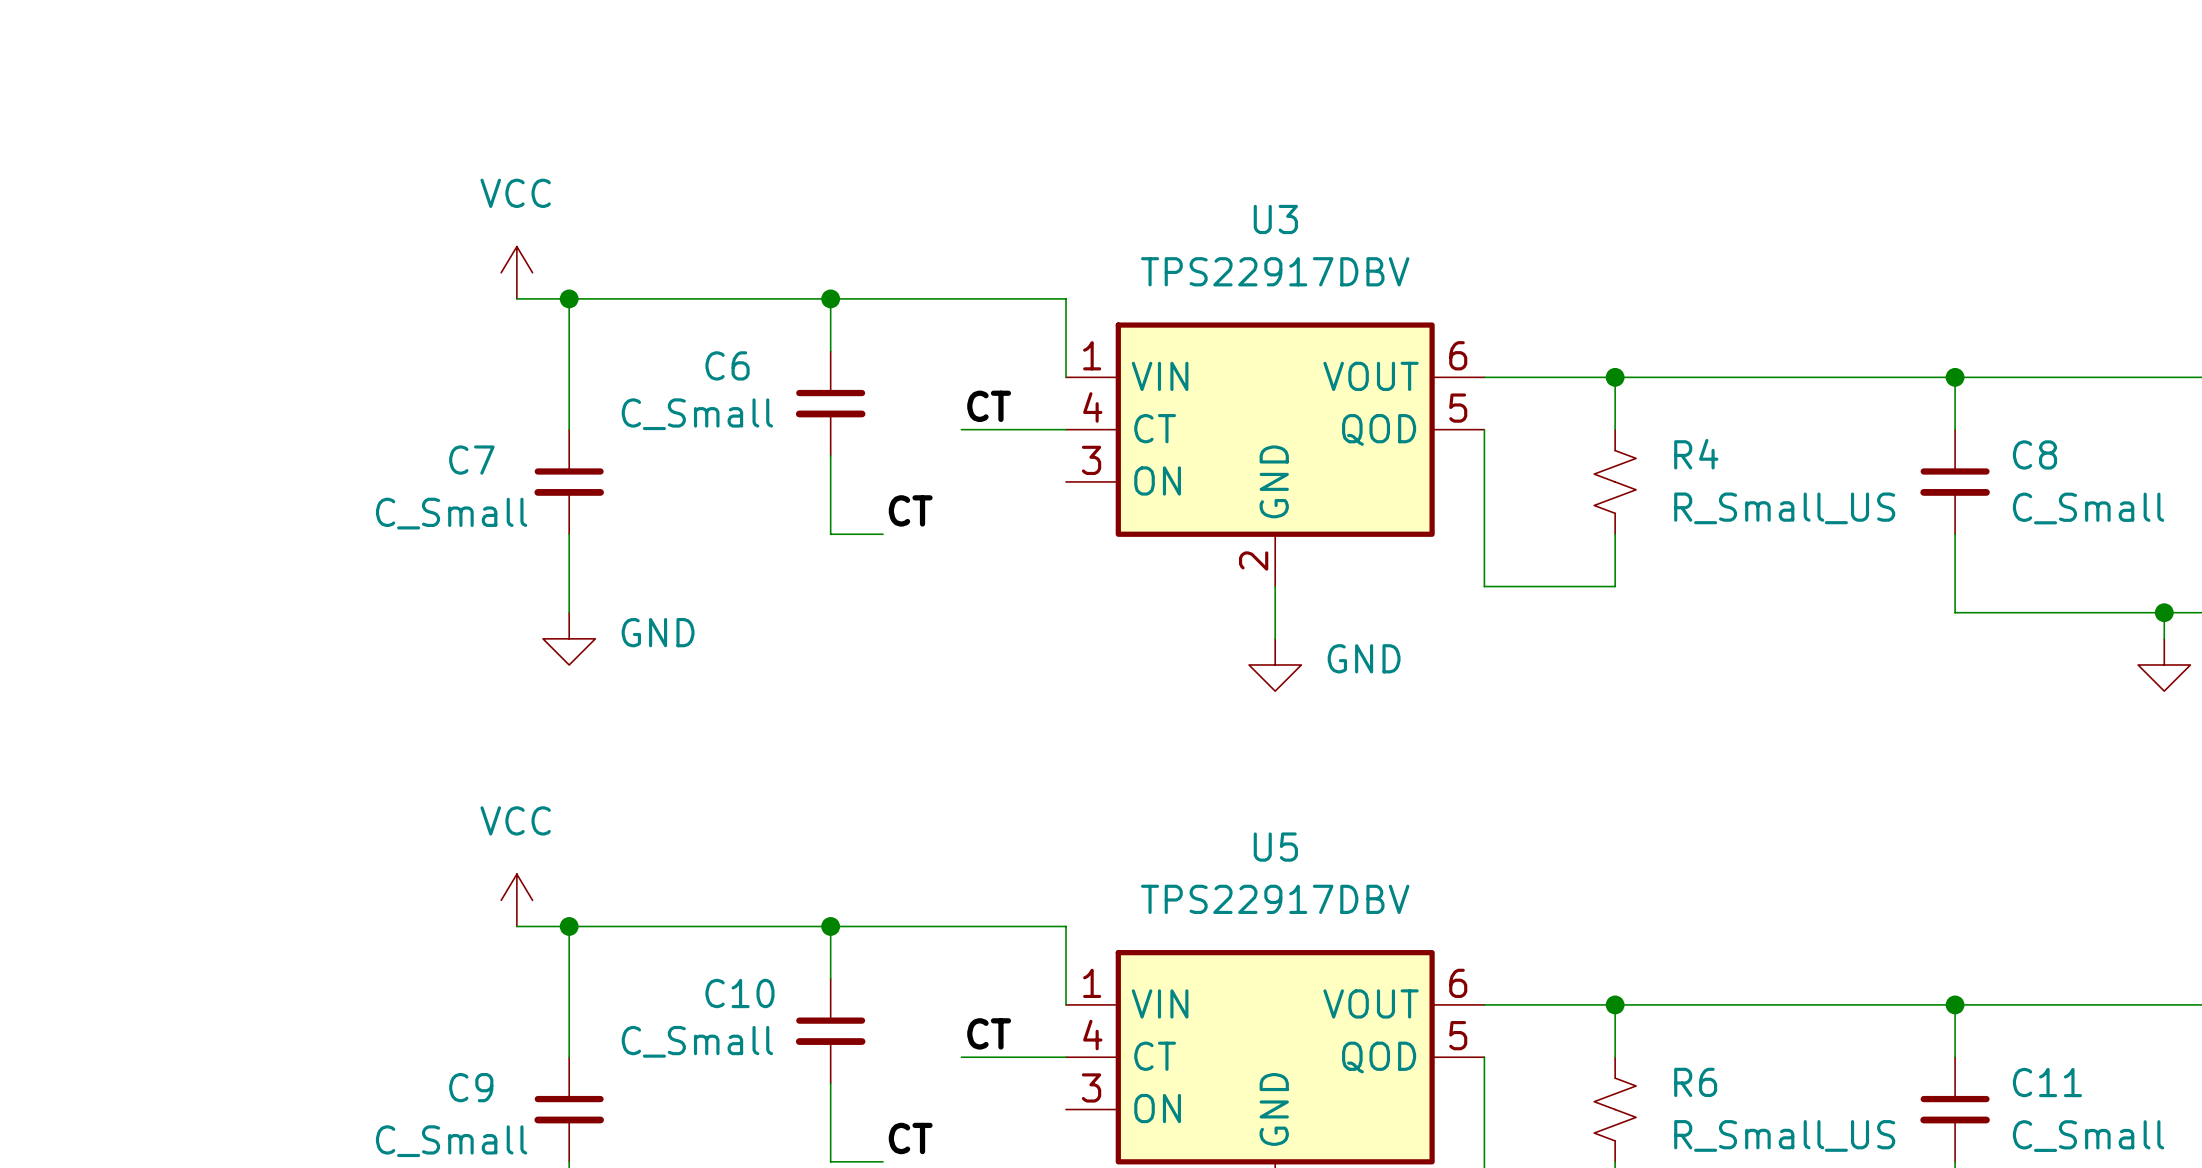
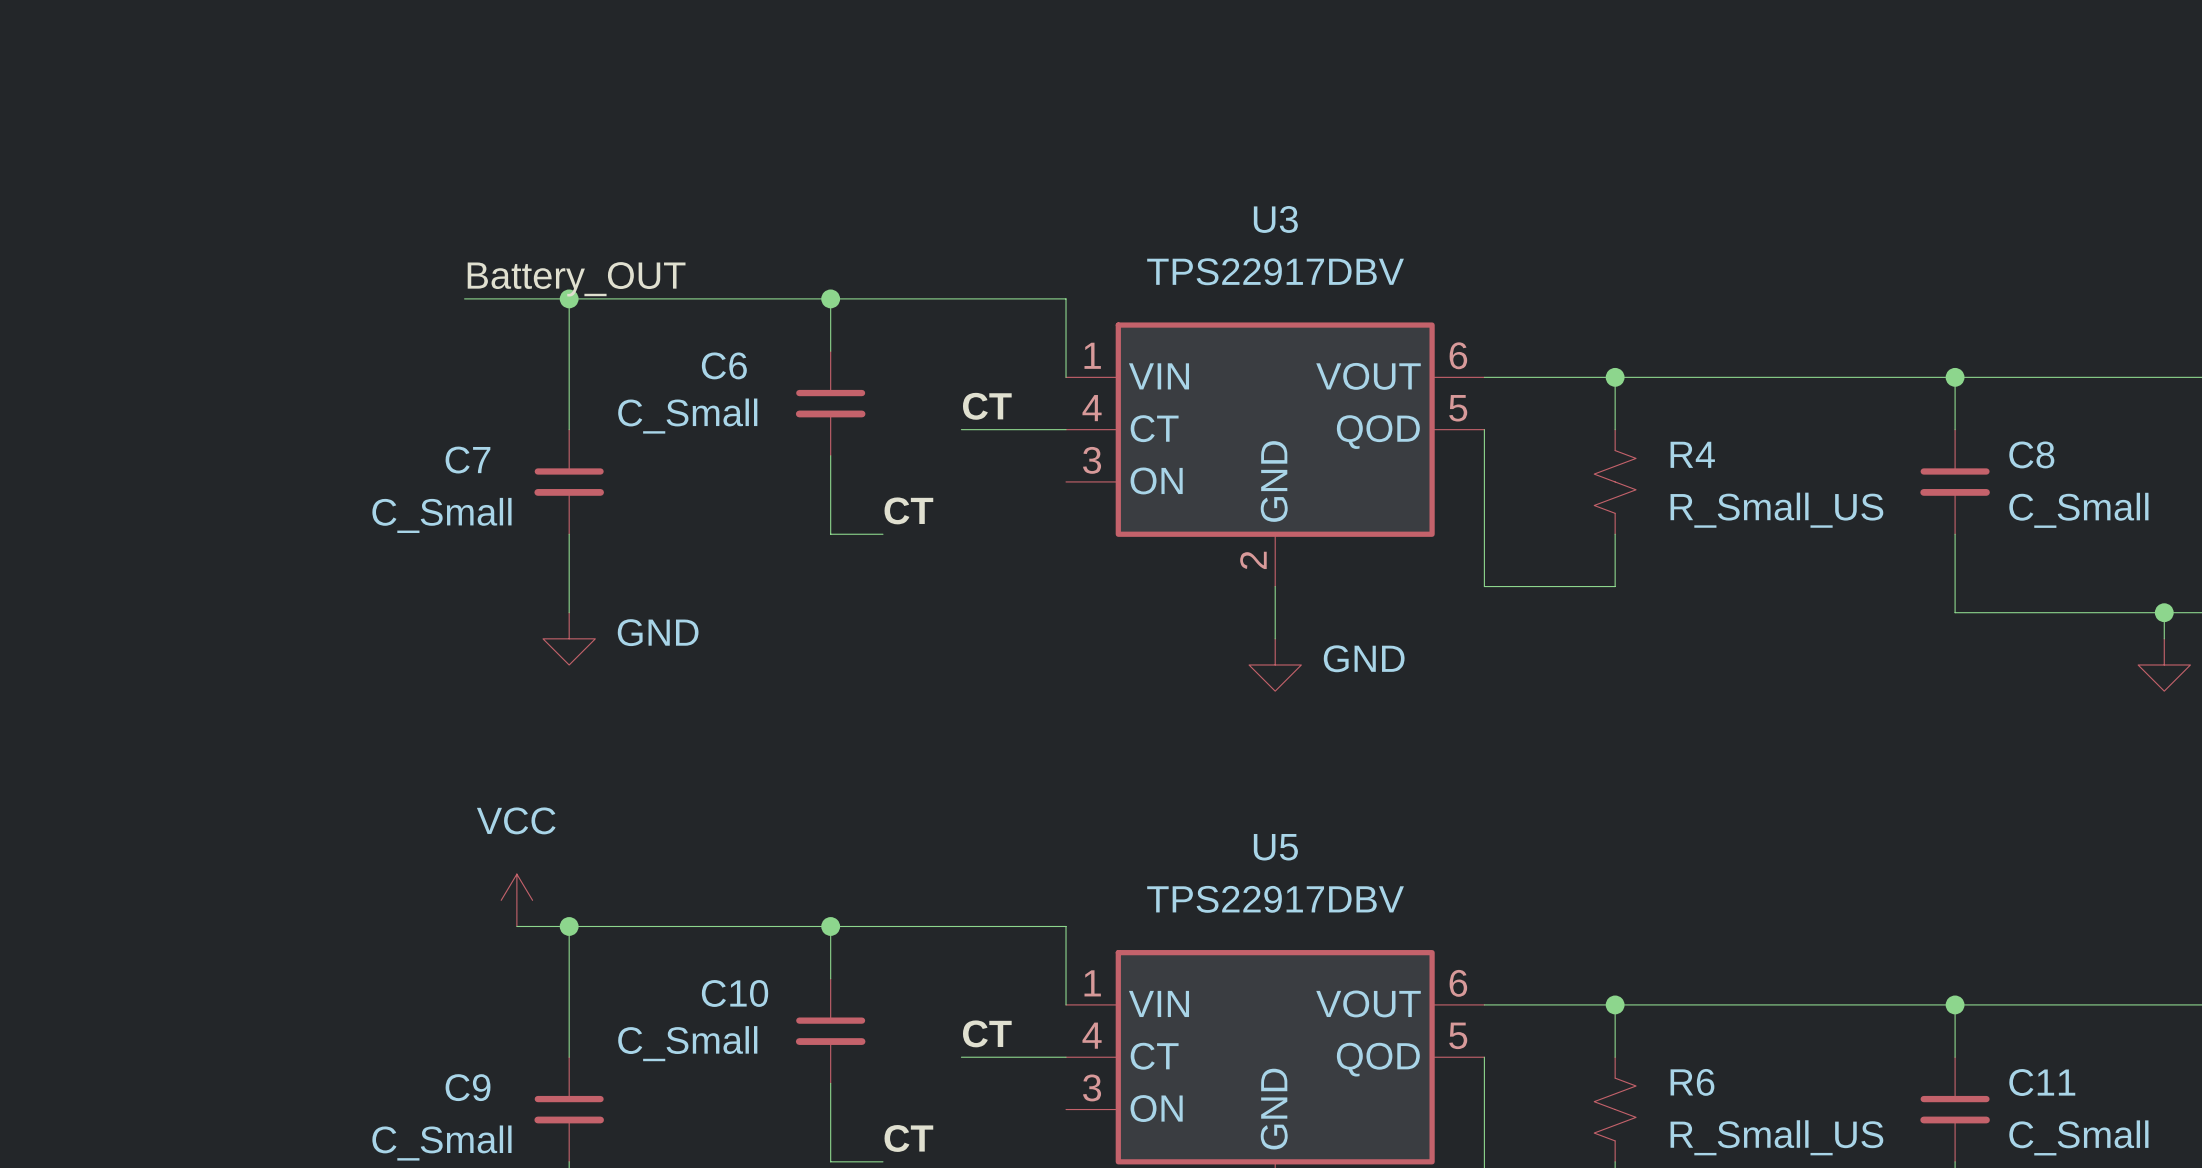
power symbol: VCC (516, 272) -> none
label: none -> Battery_OUT (576, 279)
wire: none -> (464, 298) (516, 298)

